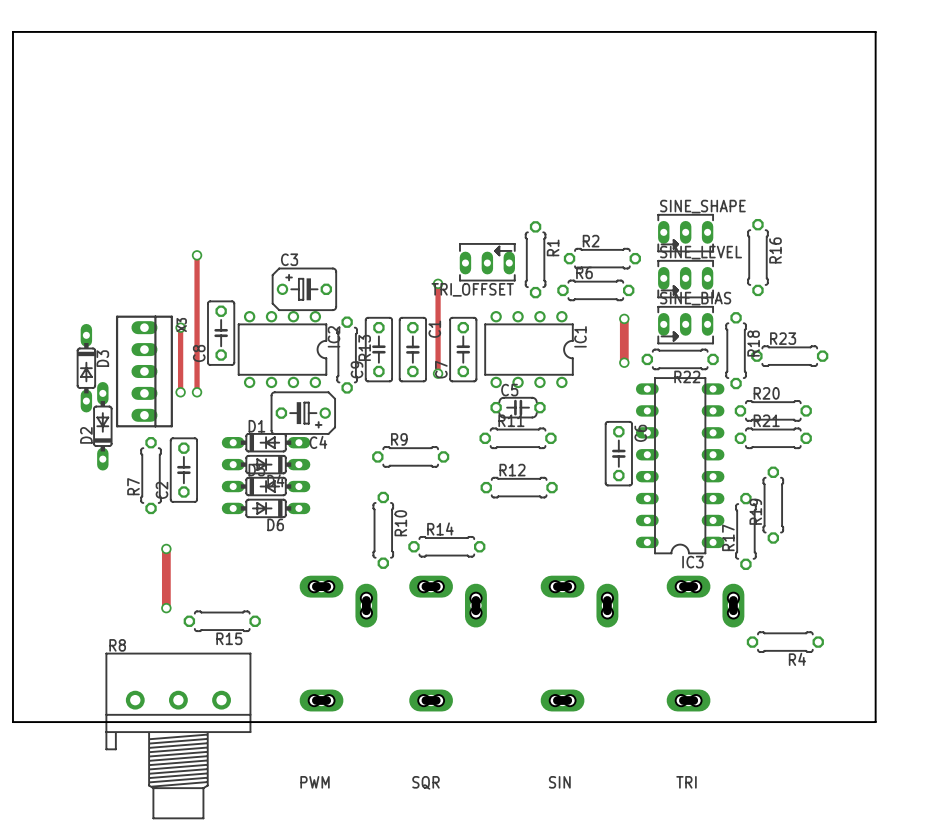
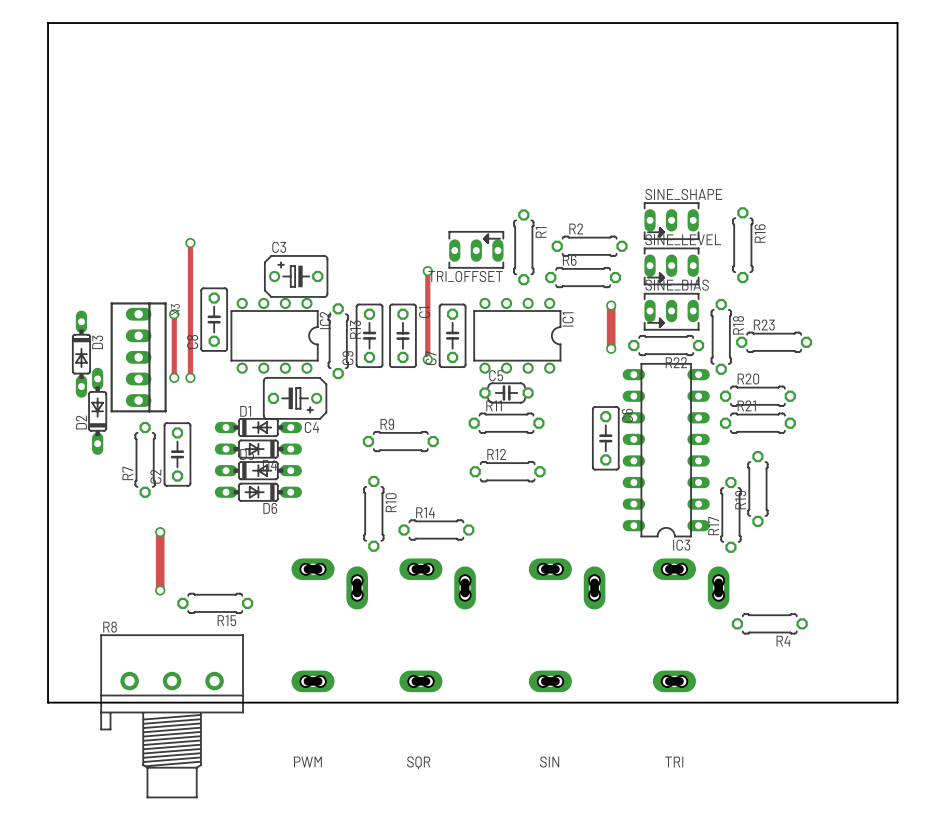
board edge: (52, 31) (12, 31) (12, 722) (52, 722) -> (48, 23) (48, 702)
board edge: (875, 31) (875, 722) -> (858, 23) (897, 23) (897, 702) (858, 702)

